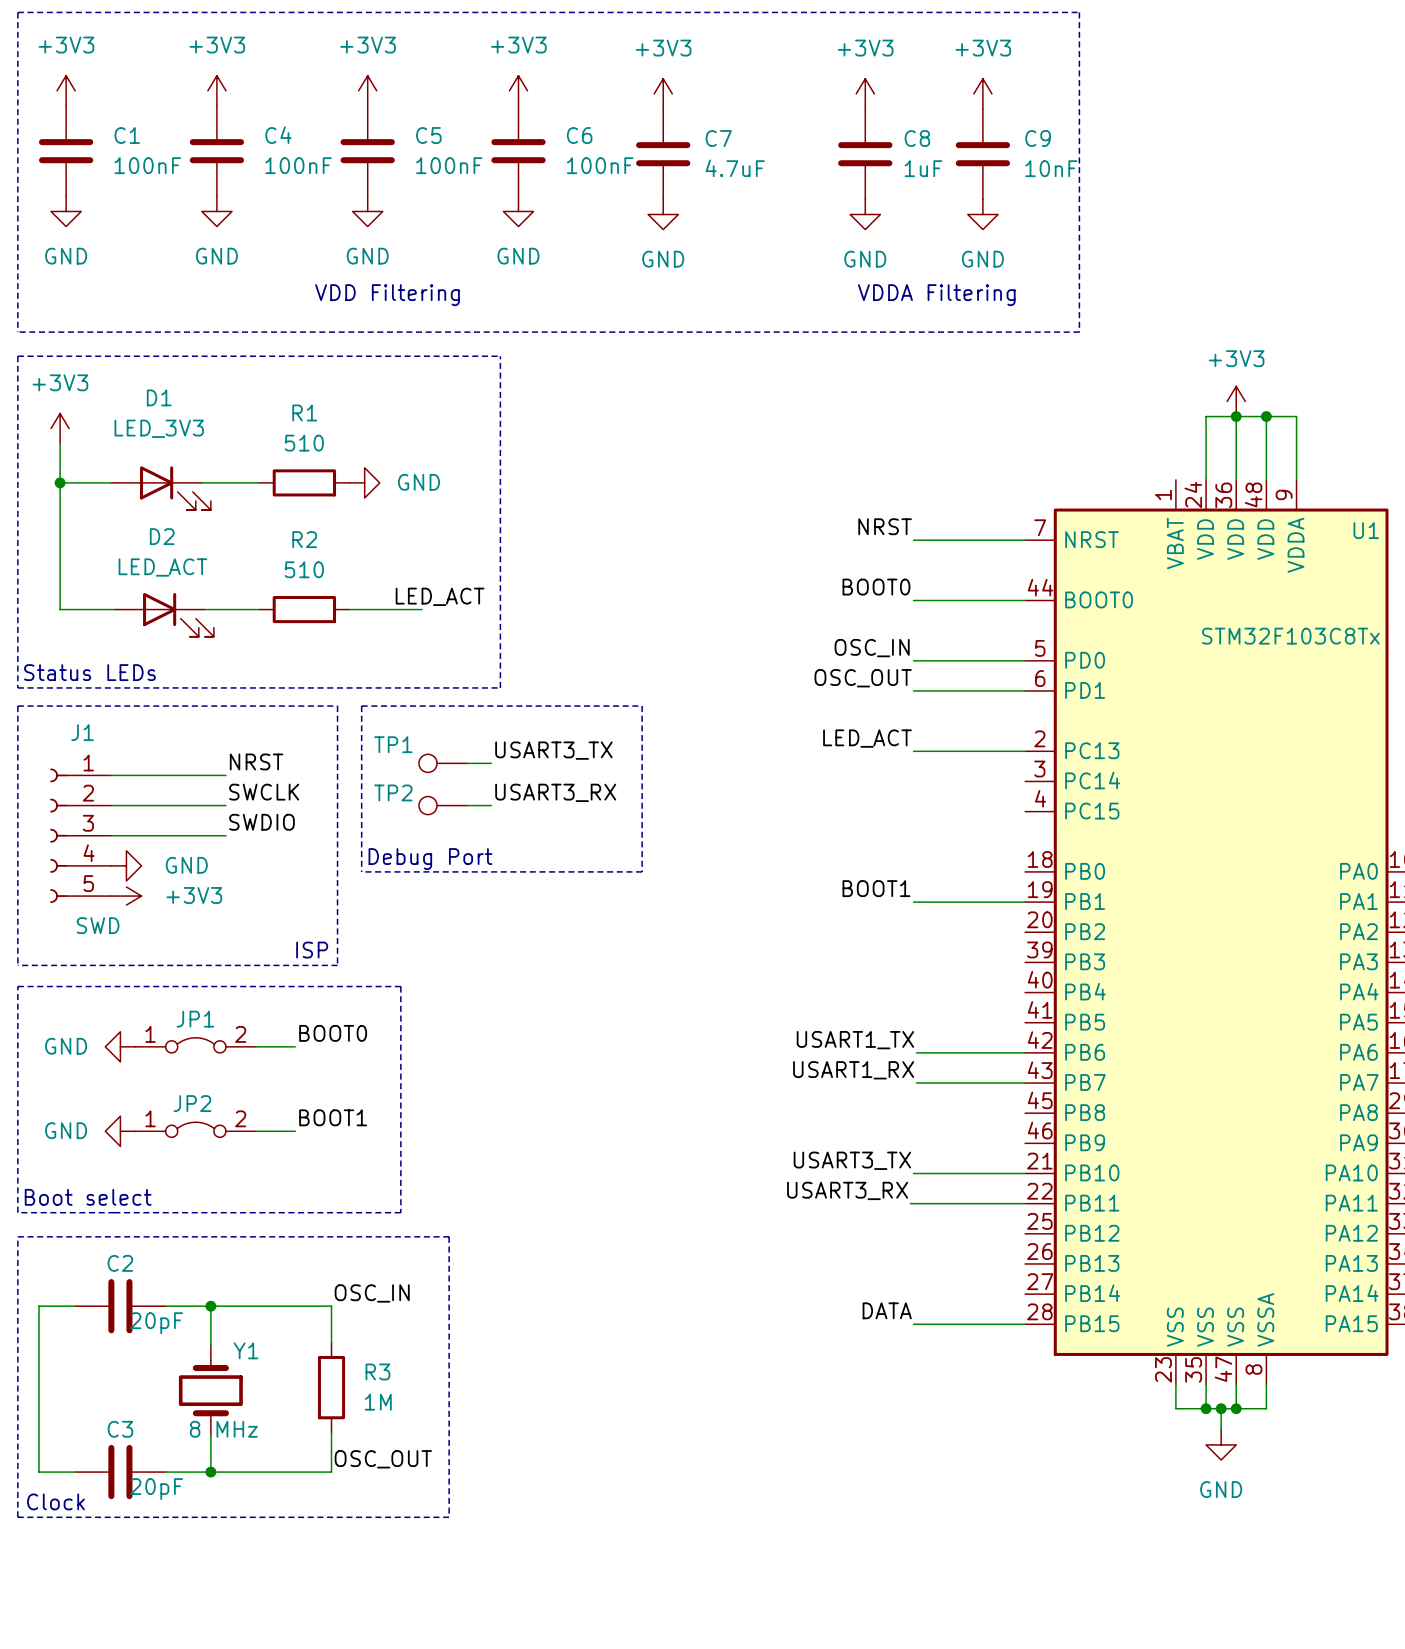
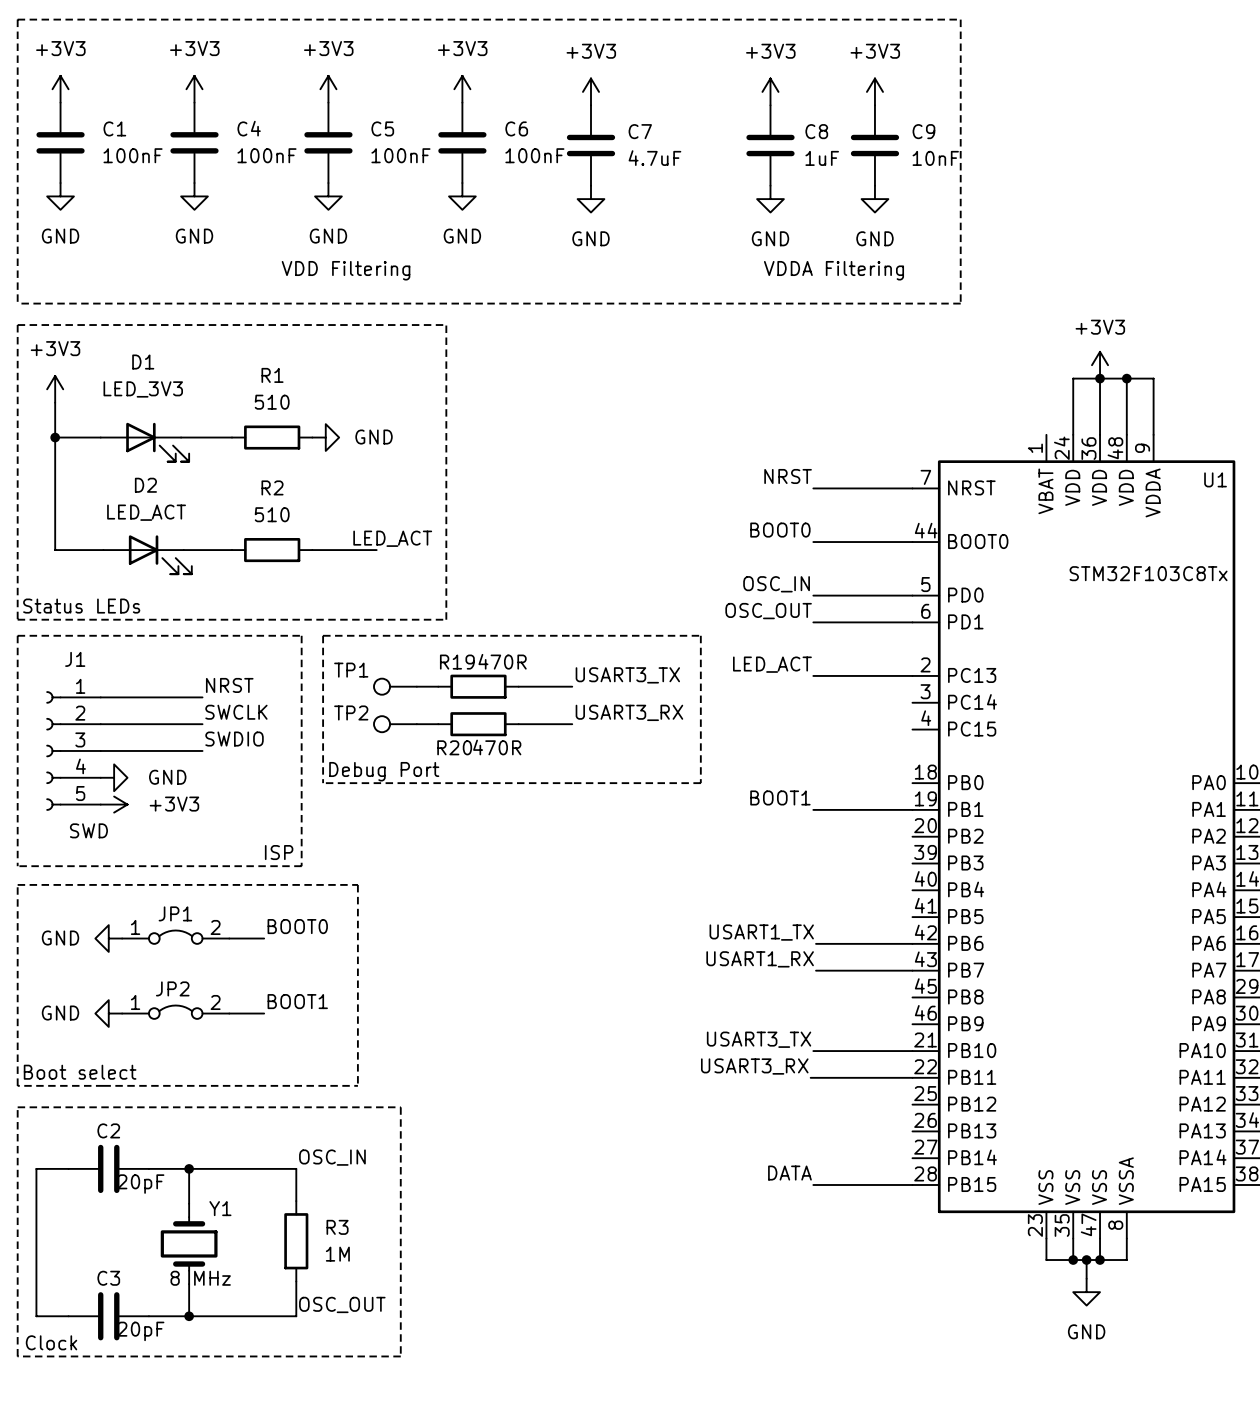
line: (642, 706) (642, 871) -> (572, 635) (700, 635) (700, 783) (572, 783)
label position: USART3_TX (553, 750) -> USART3_TX (627, 675)
R19: none -> 470R (478, 686)
wire: none -> (518, 686) (572, 686)
label position: USART3_RX (555, 792) -> USART3_RX (629, 712)
R20: none -> 470R (478, 724)
wire: none -> (518, 724) (572, 724)

